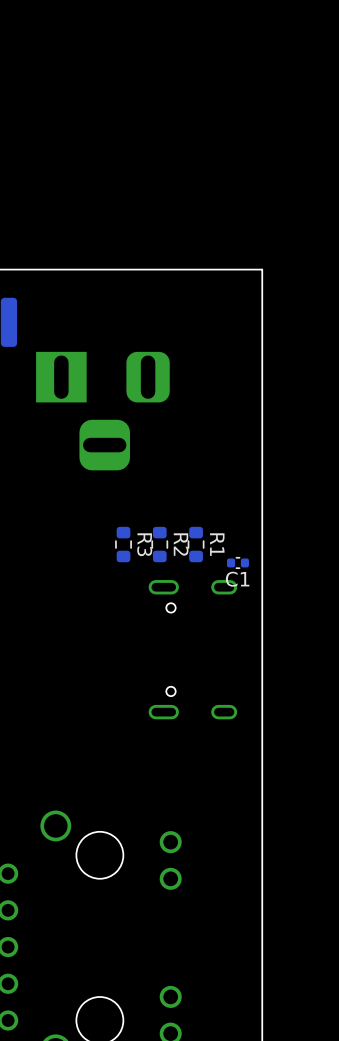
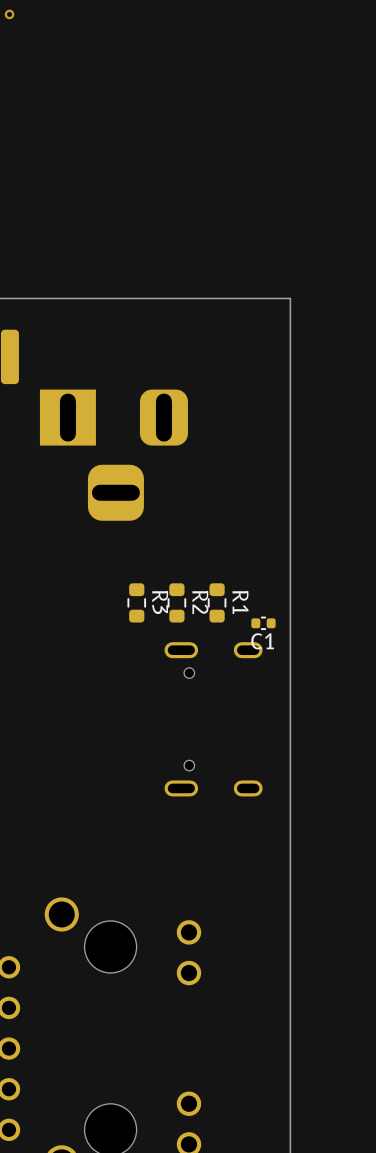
via: none -> (9, 14)

